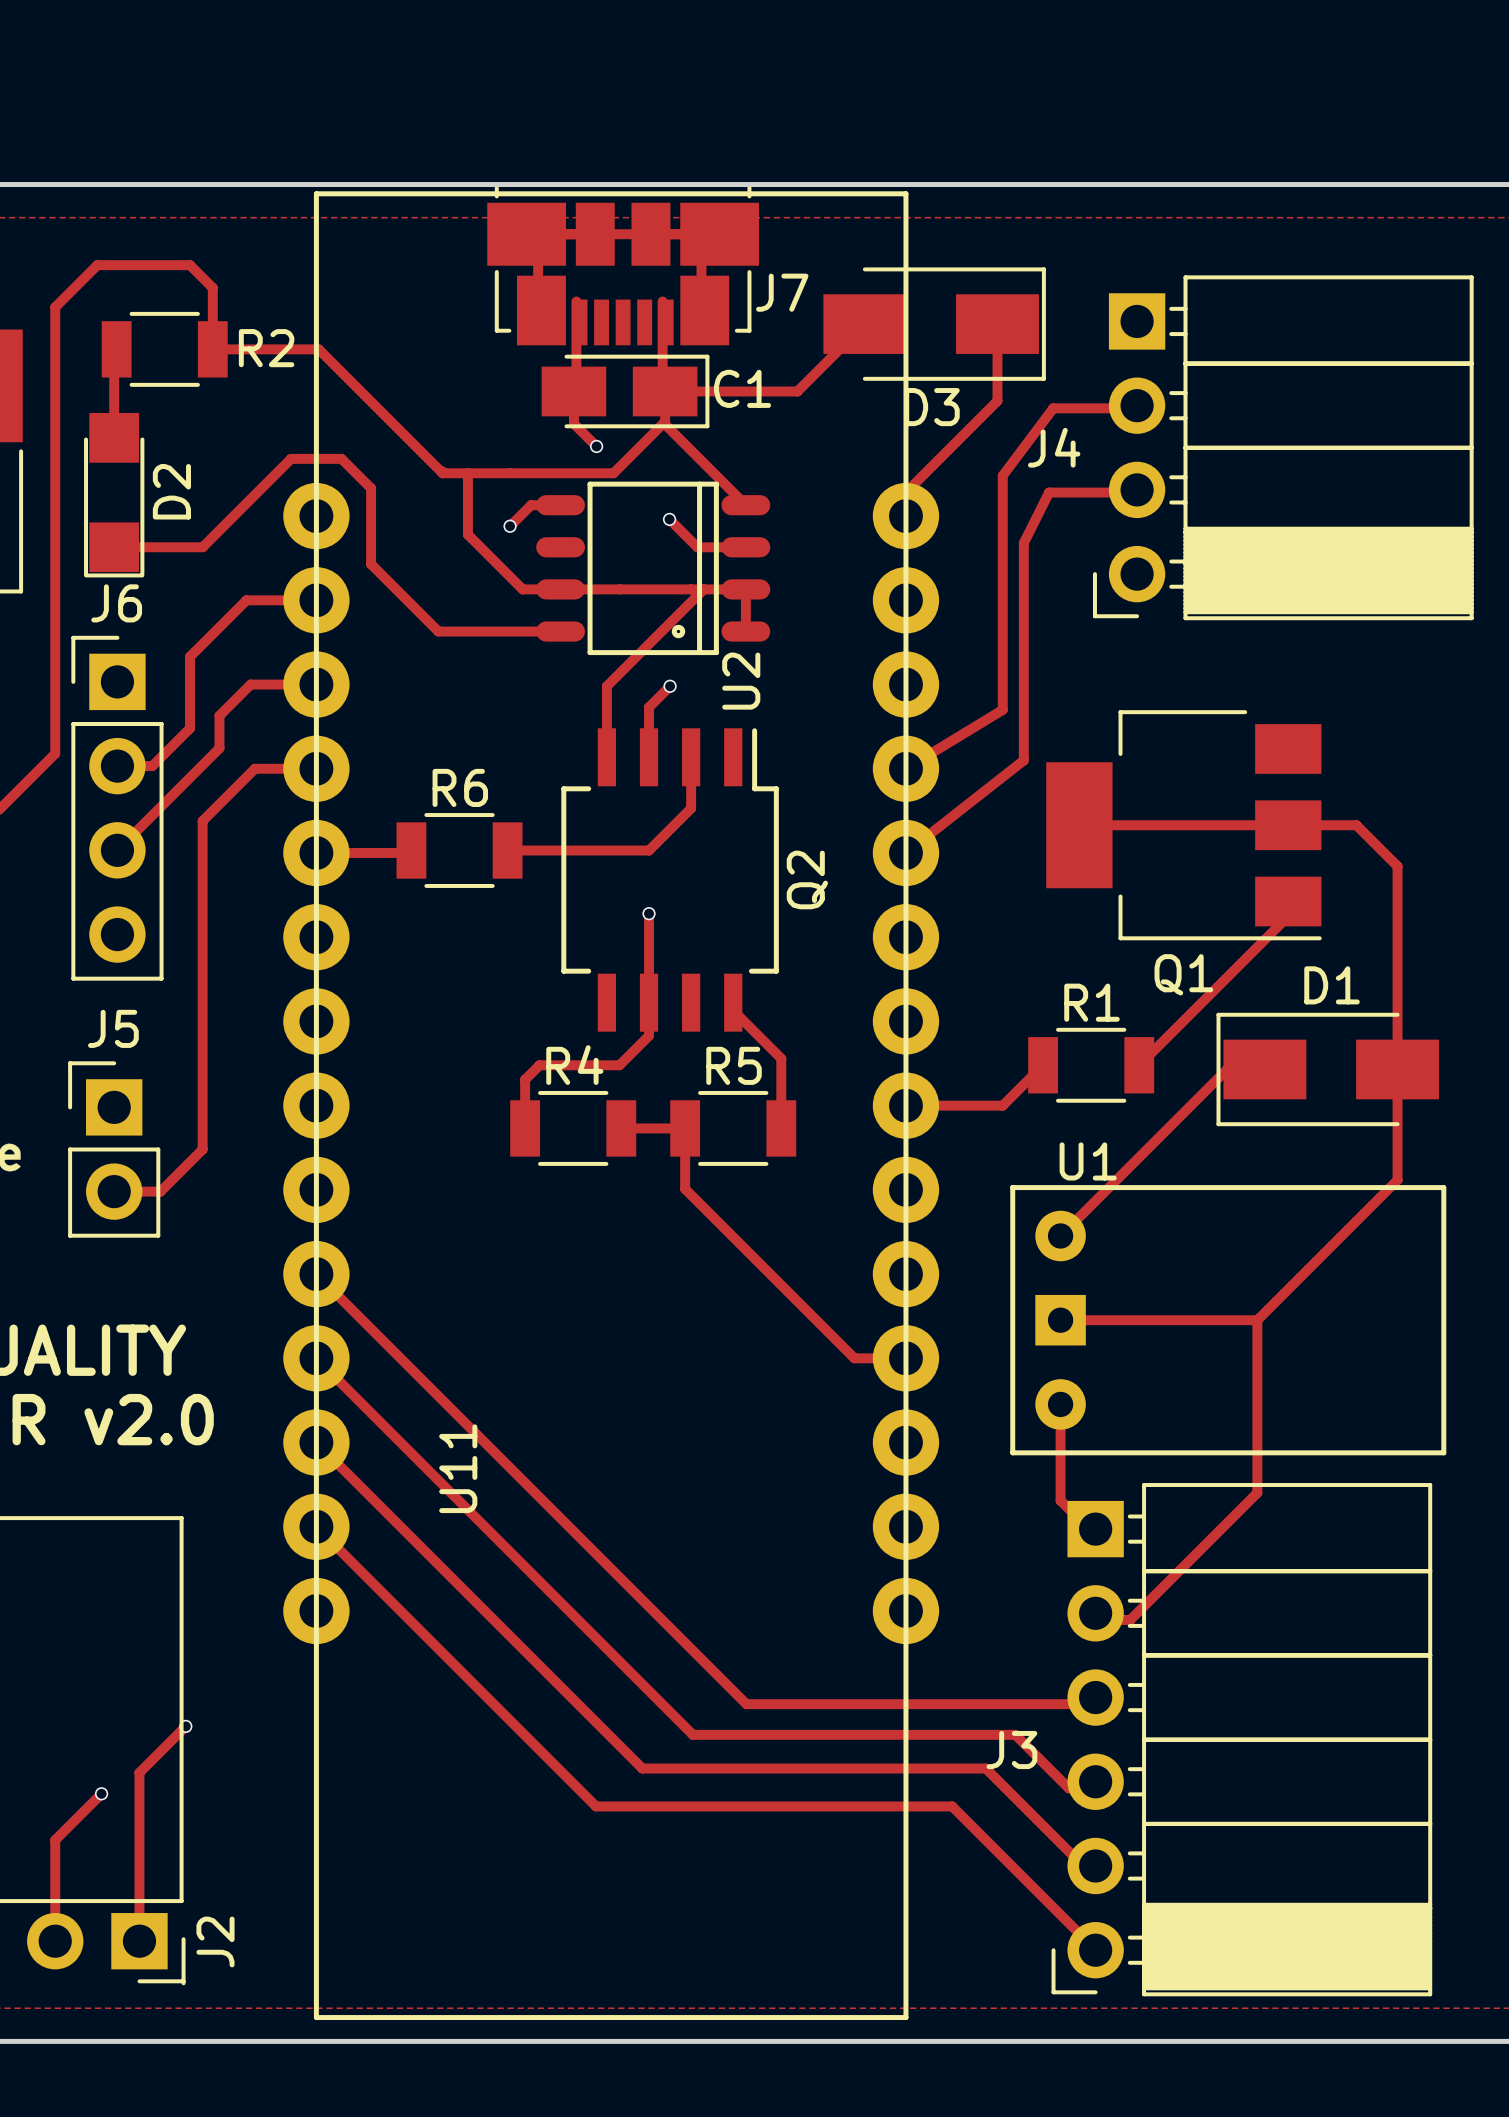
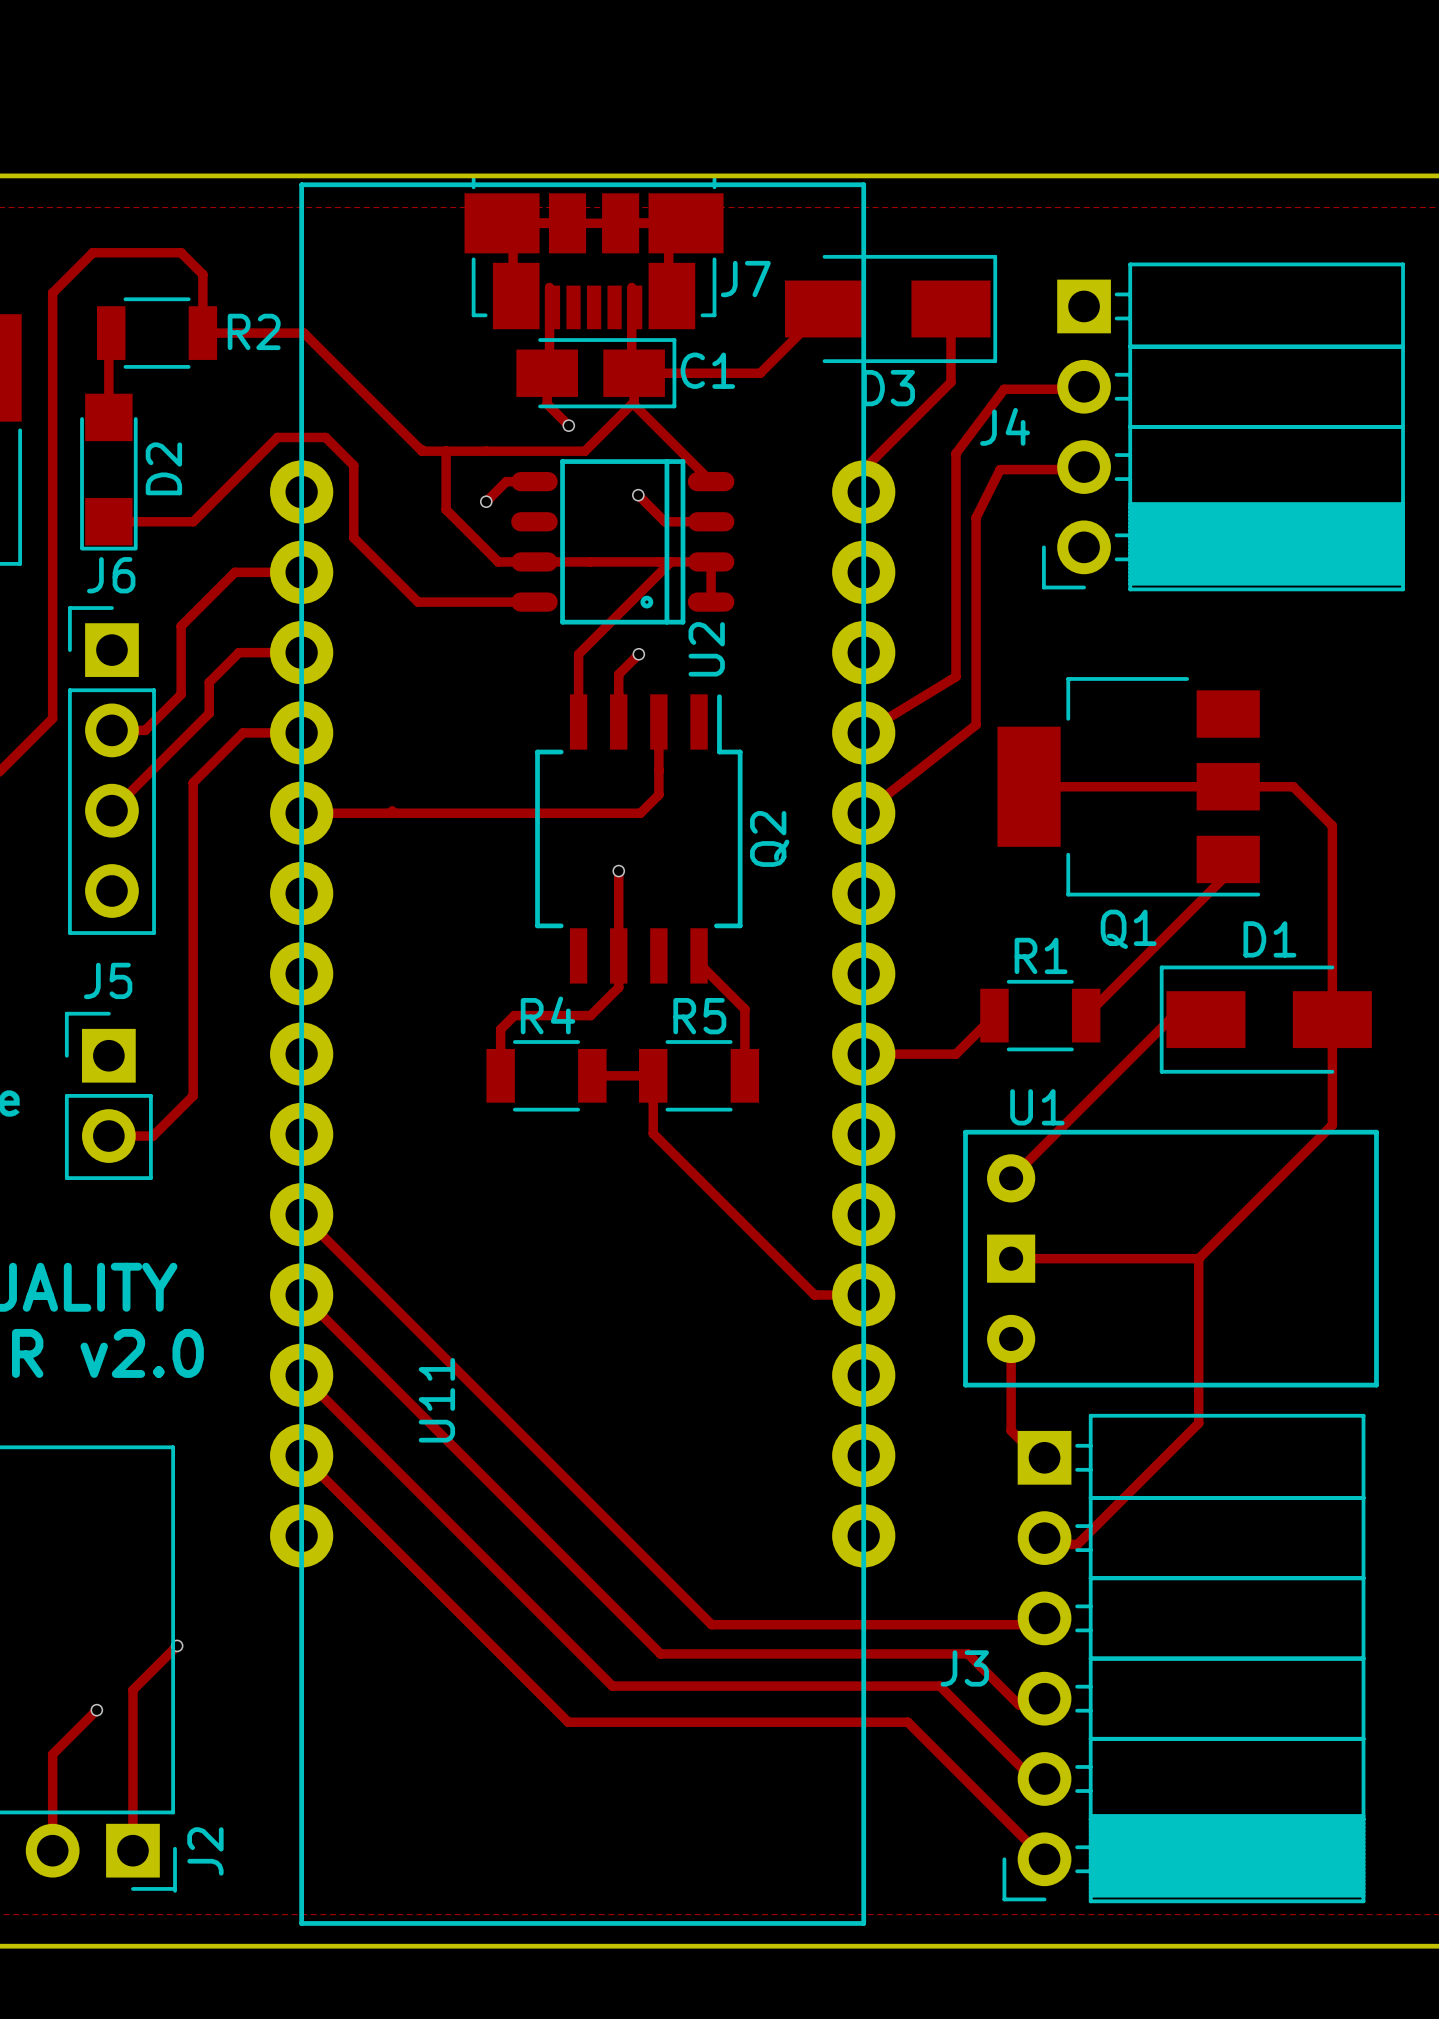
track: (691, 808) (649, 850) (507, 850) -> (658, 770) (658, 794) (640, 813) (389, 813)
R6: (459, 850) -> none

